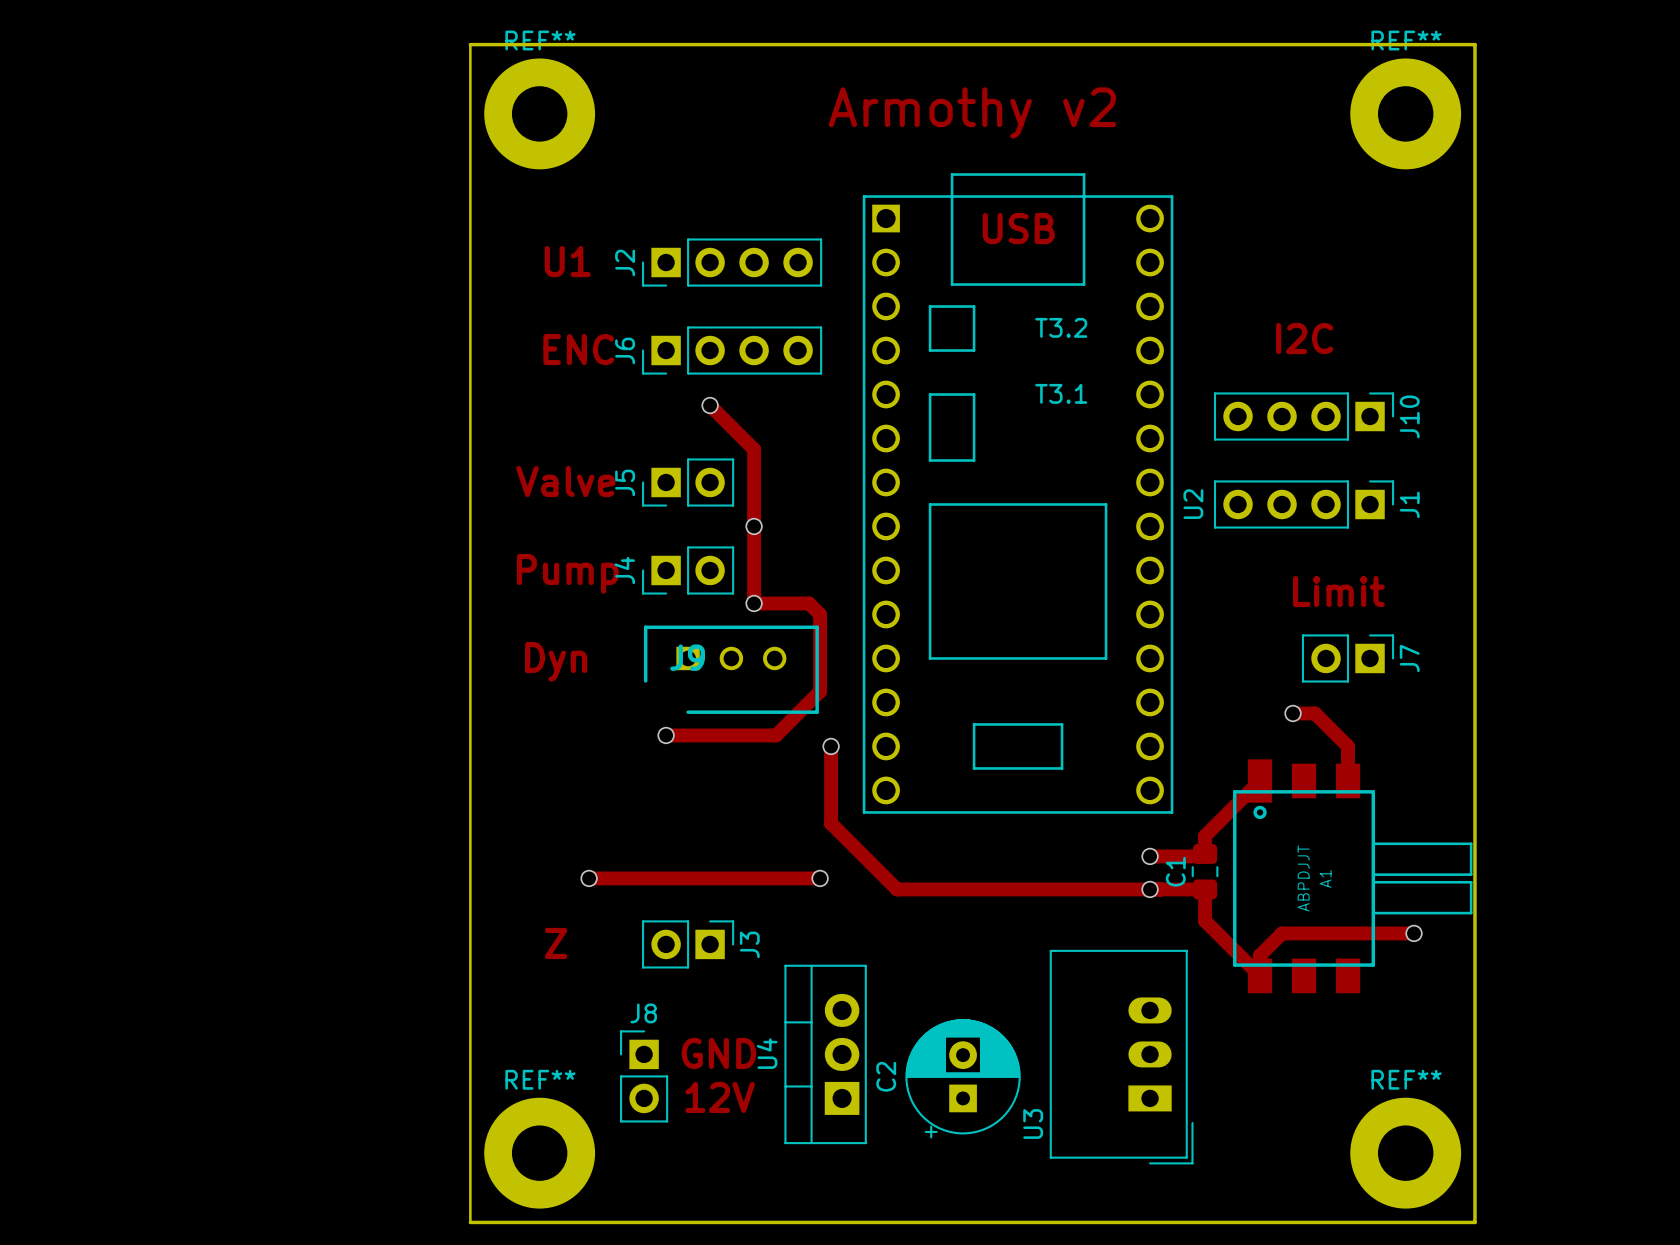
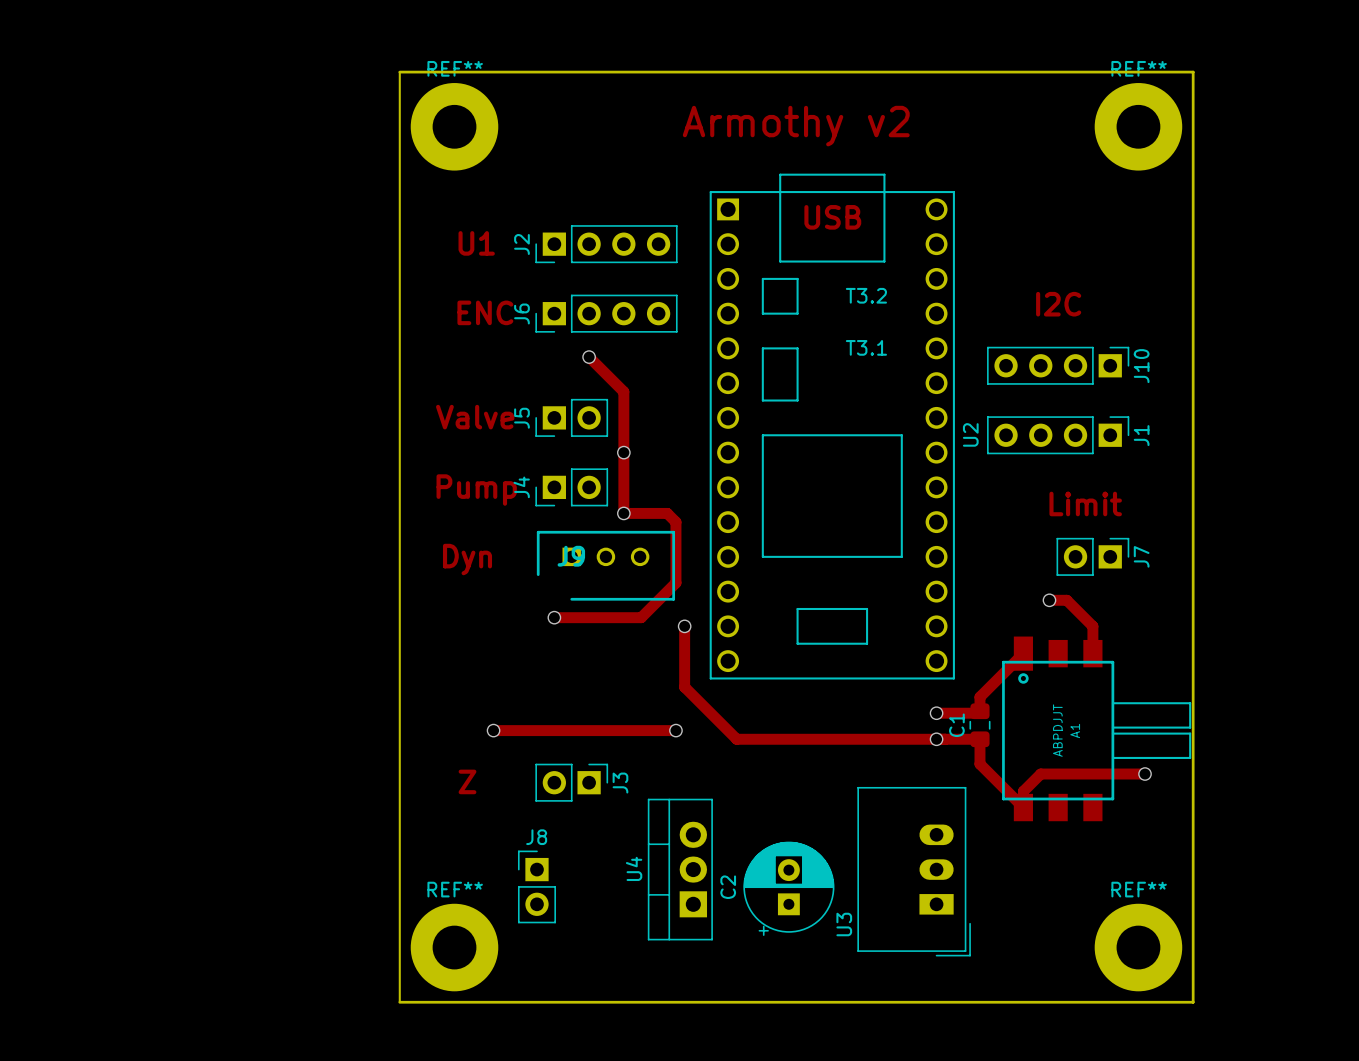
text: GND (718, 1053) -> none
text: 12V (720, 1097) -> none

